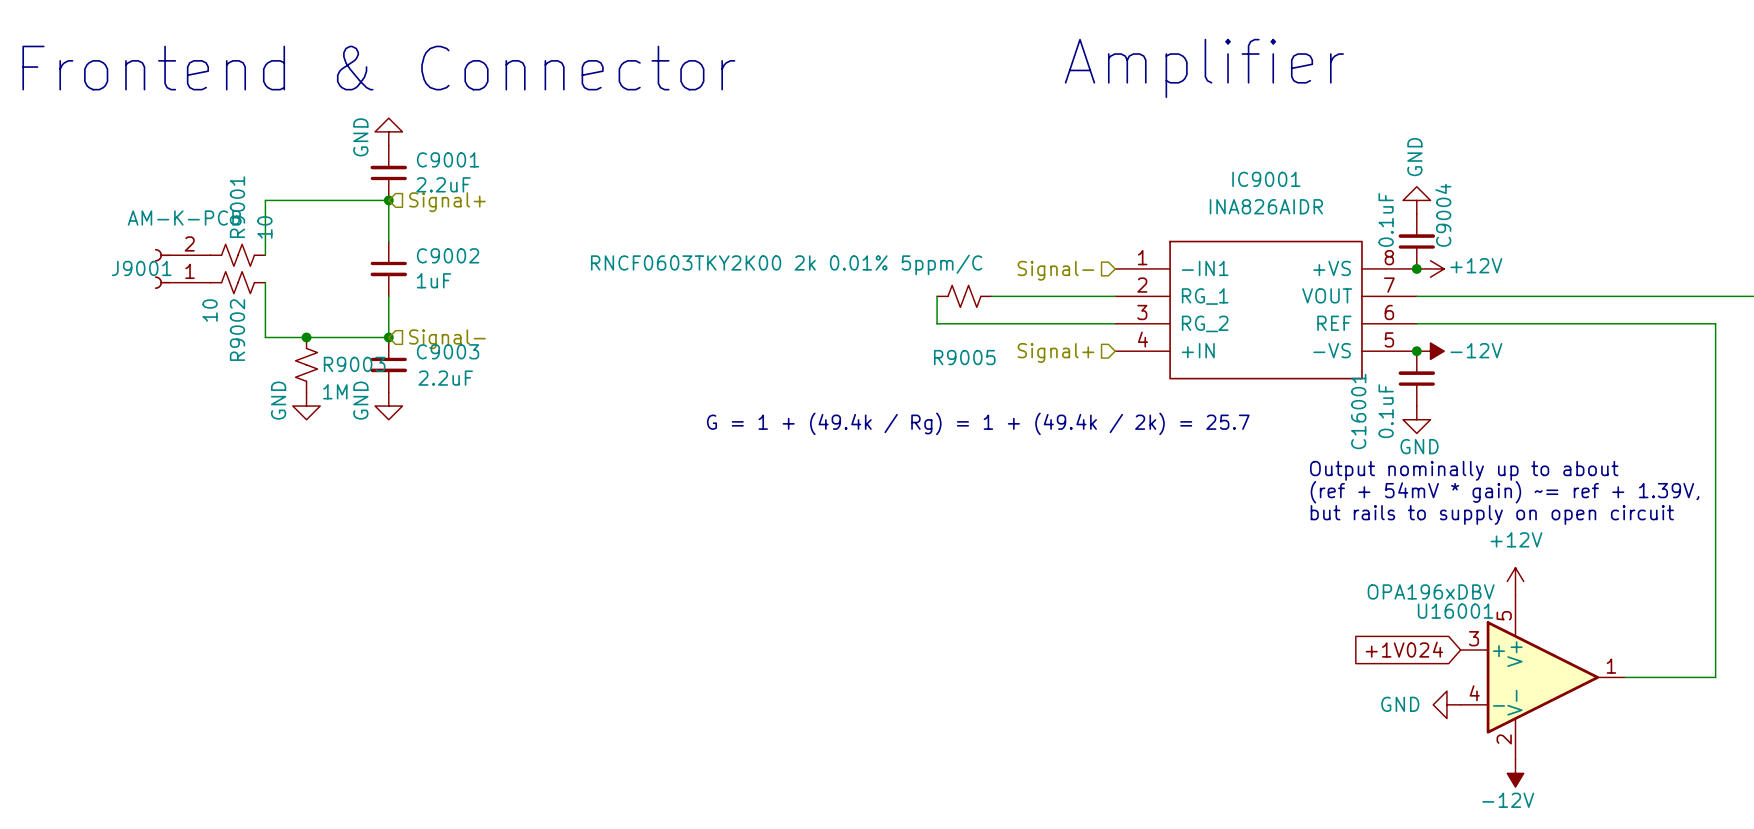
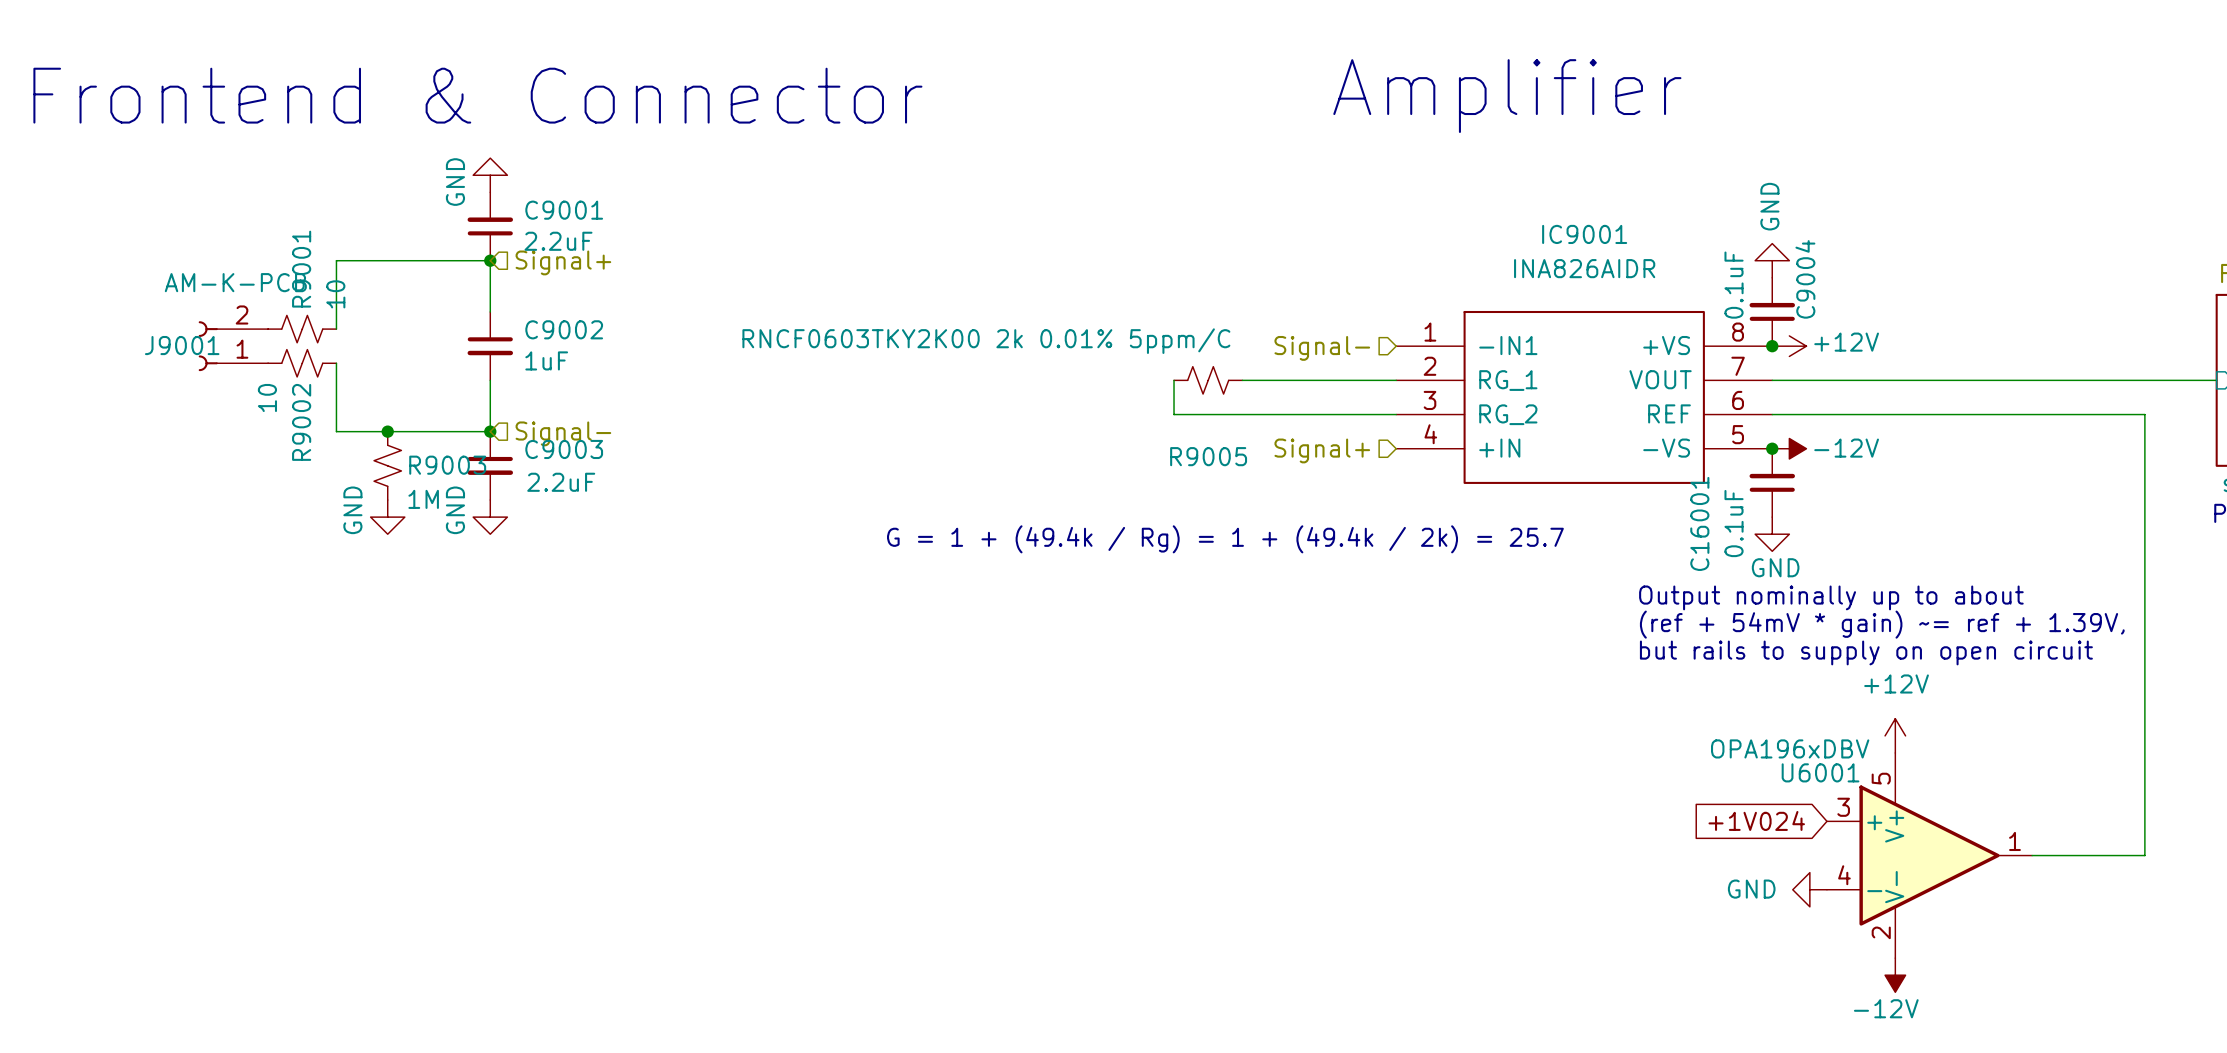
U16001 name: U16001 (1455, 611) -> U6001 (1820, 772)

